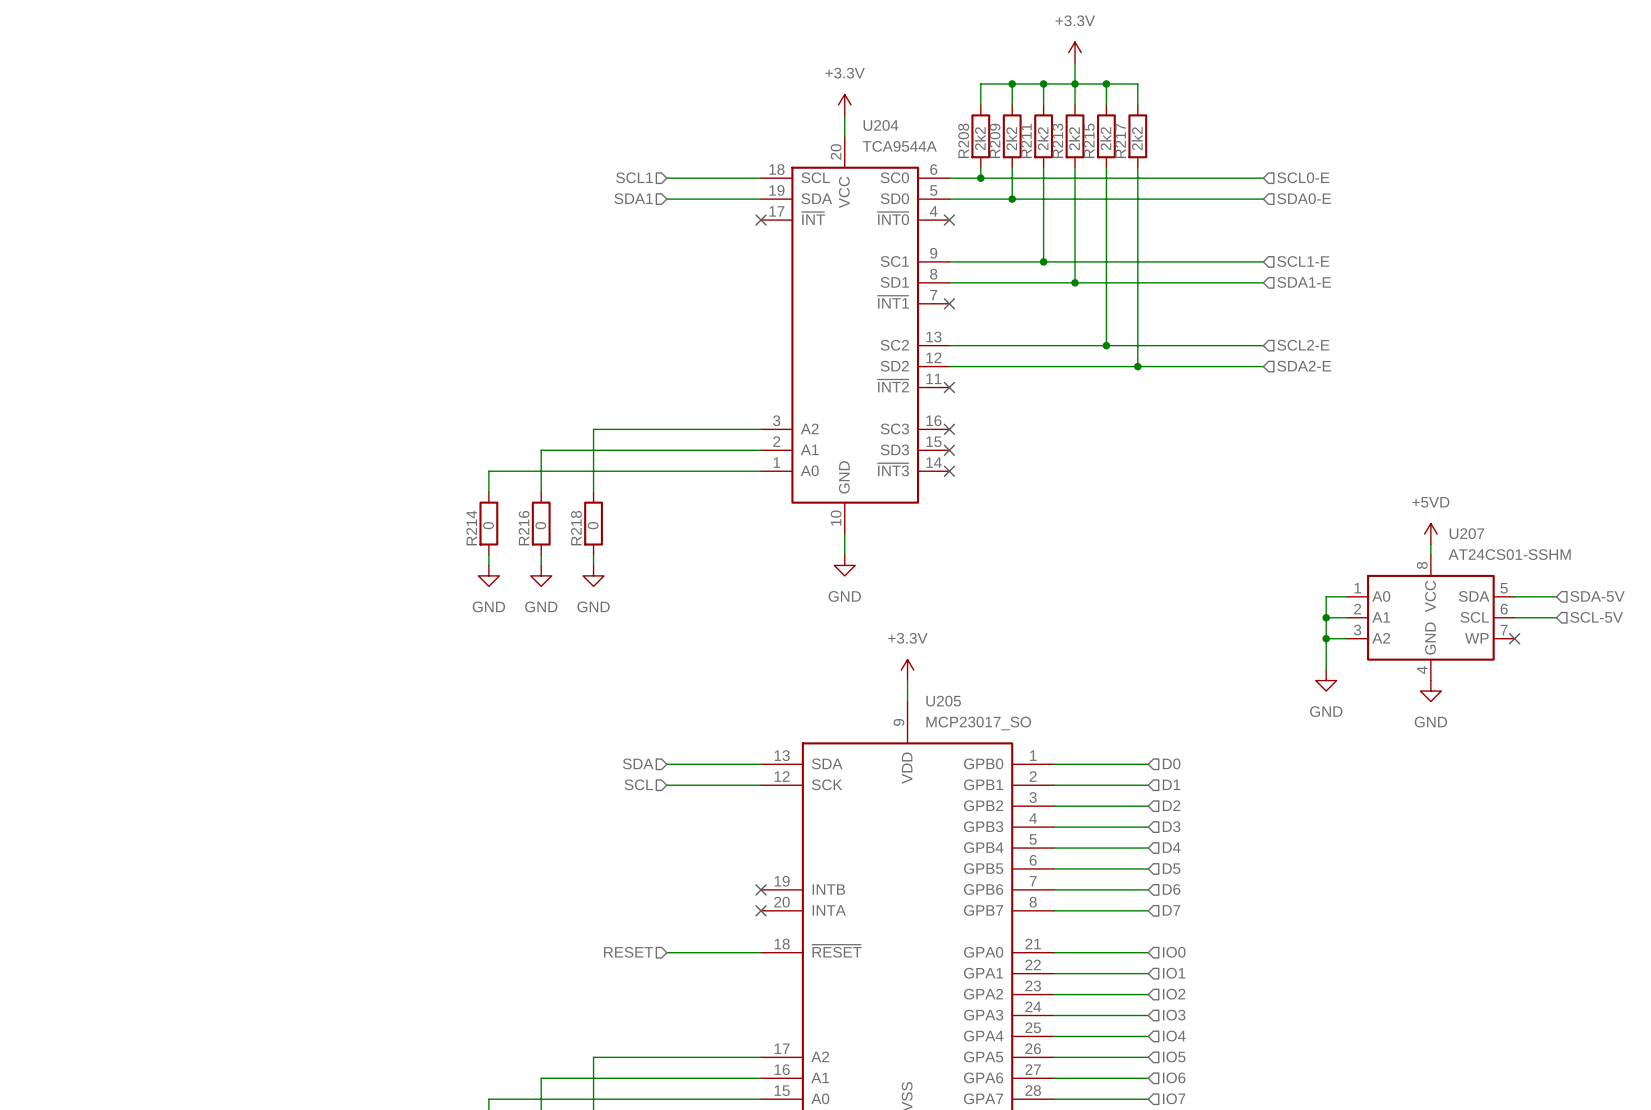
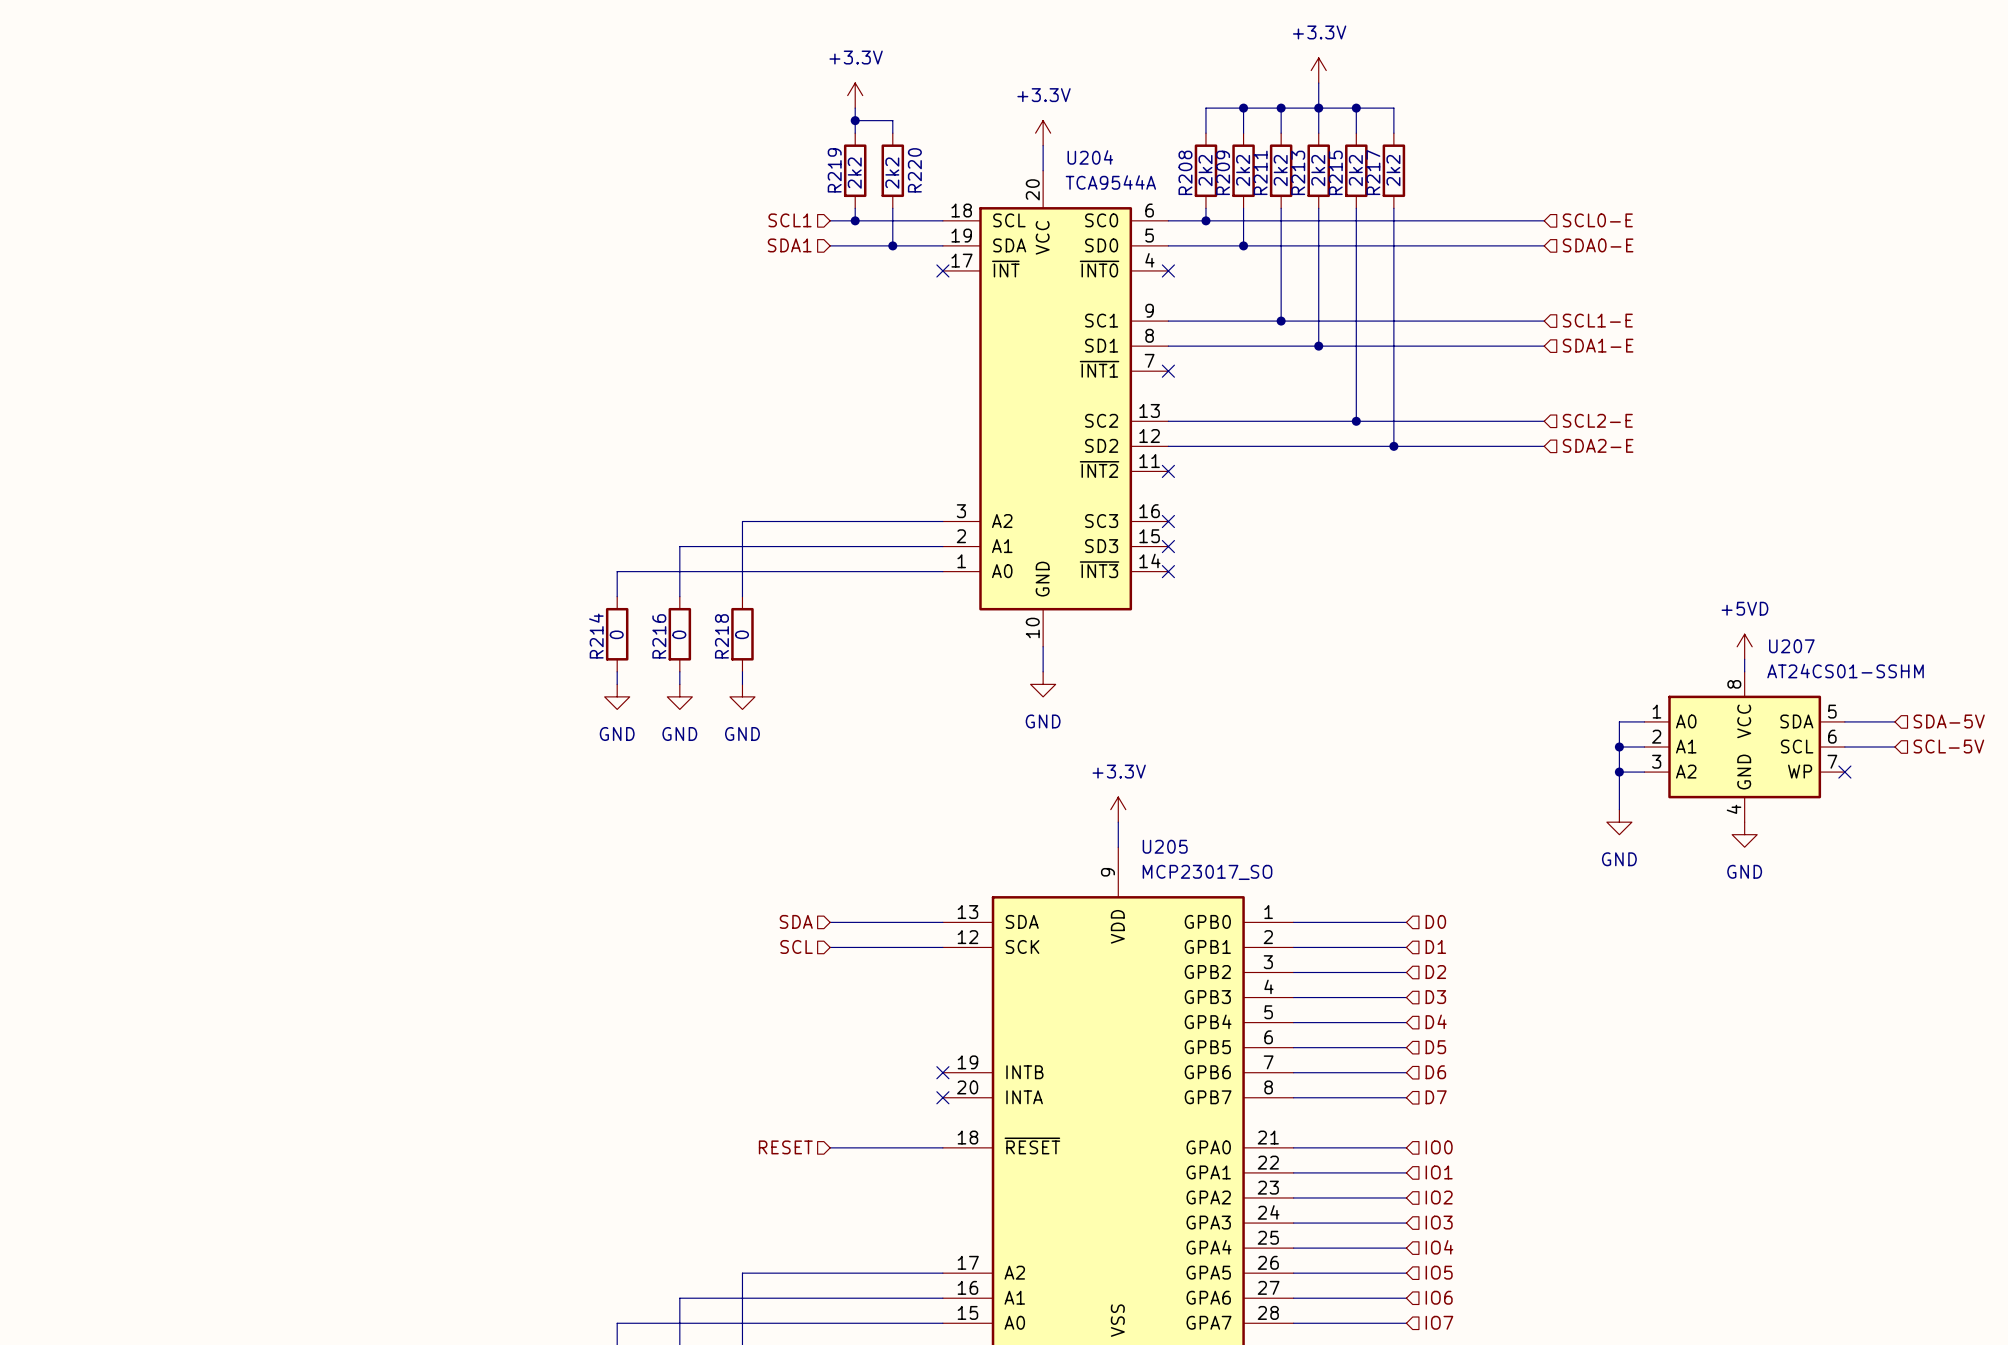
power symbol: none -> +3.3V (855, 95)
wire: none -> (855, 108) (855, 133)
wire: none -> (855, 120) (892, 120) (892, 133)
junction: none -> (855, 120)
R219: none -> 2k2 (855, 170)
R220: none -> 2k2 (892, 170)
wire: none -> (855, 208) (855, 220)
wire: none -> (892, 208) (892, 245)
junction: none -> (855, 220)
junction: none -> (892, 245)

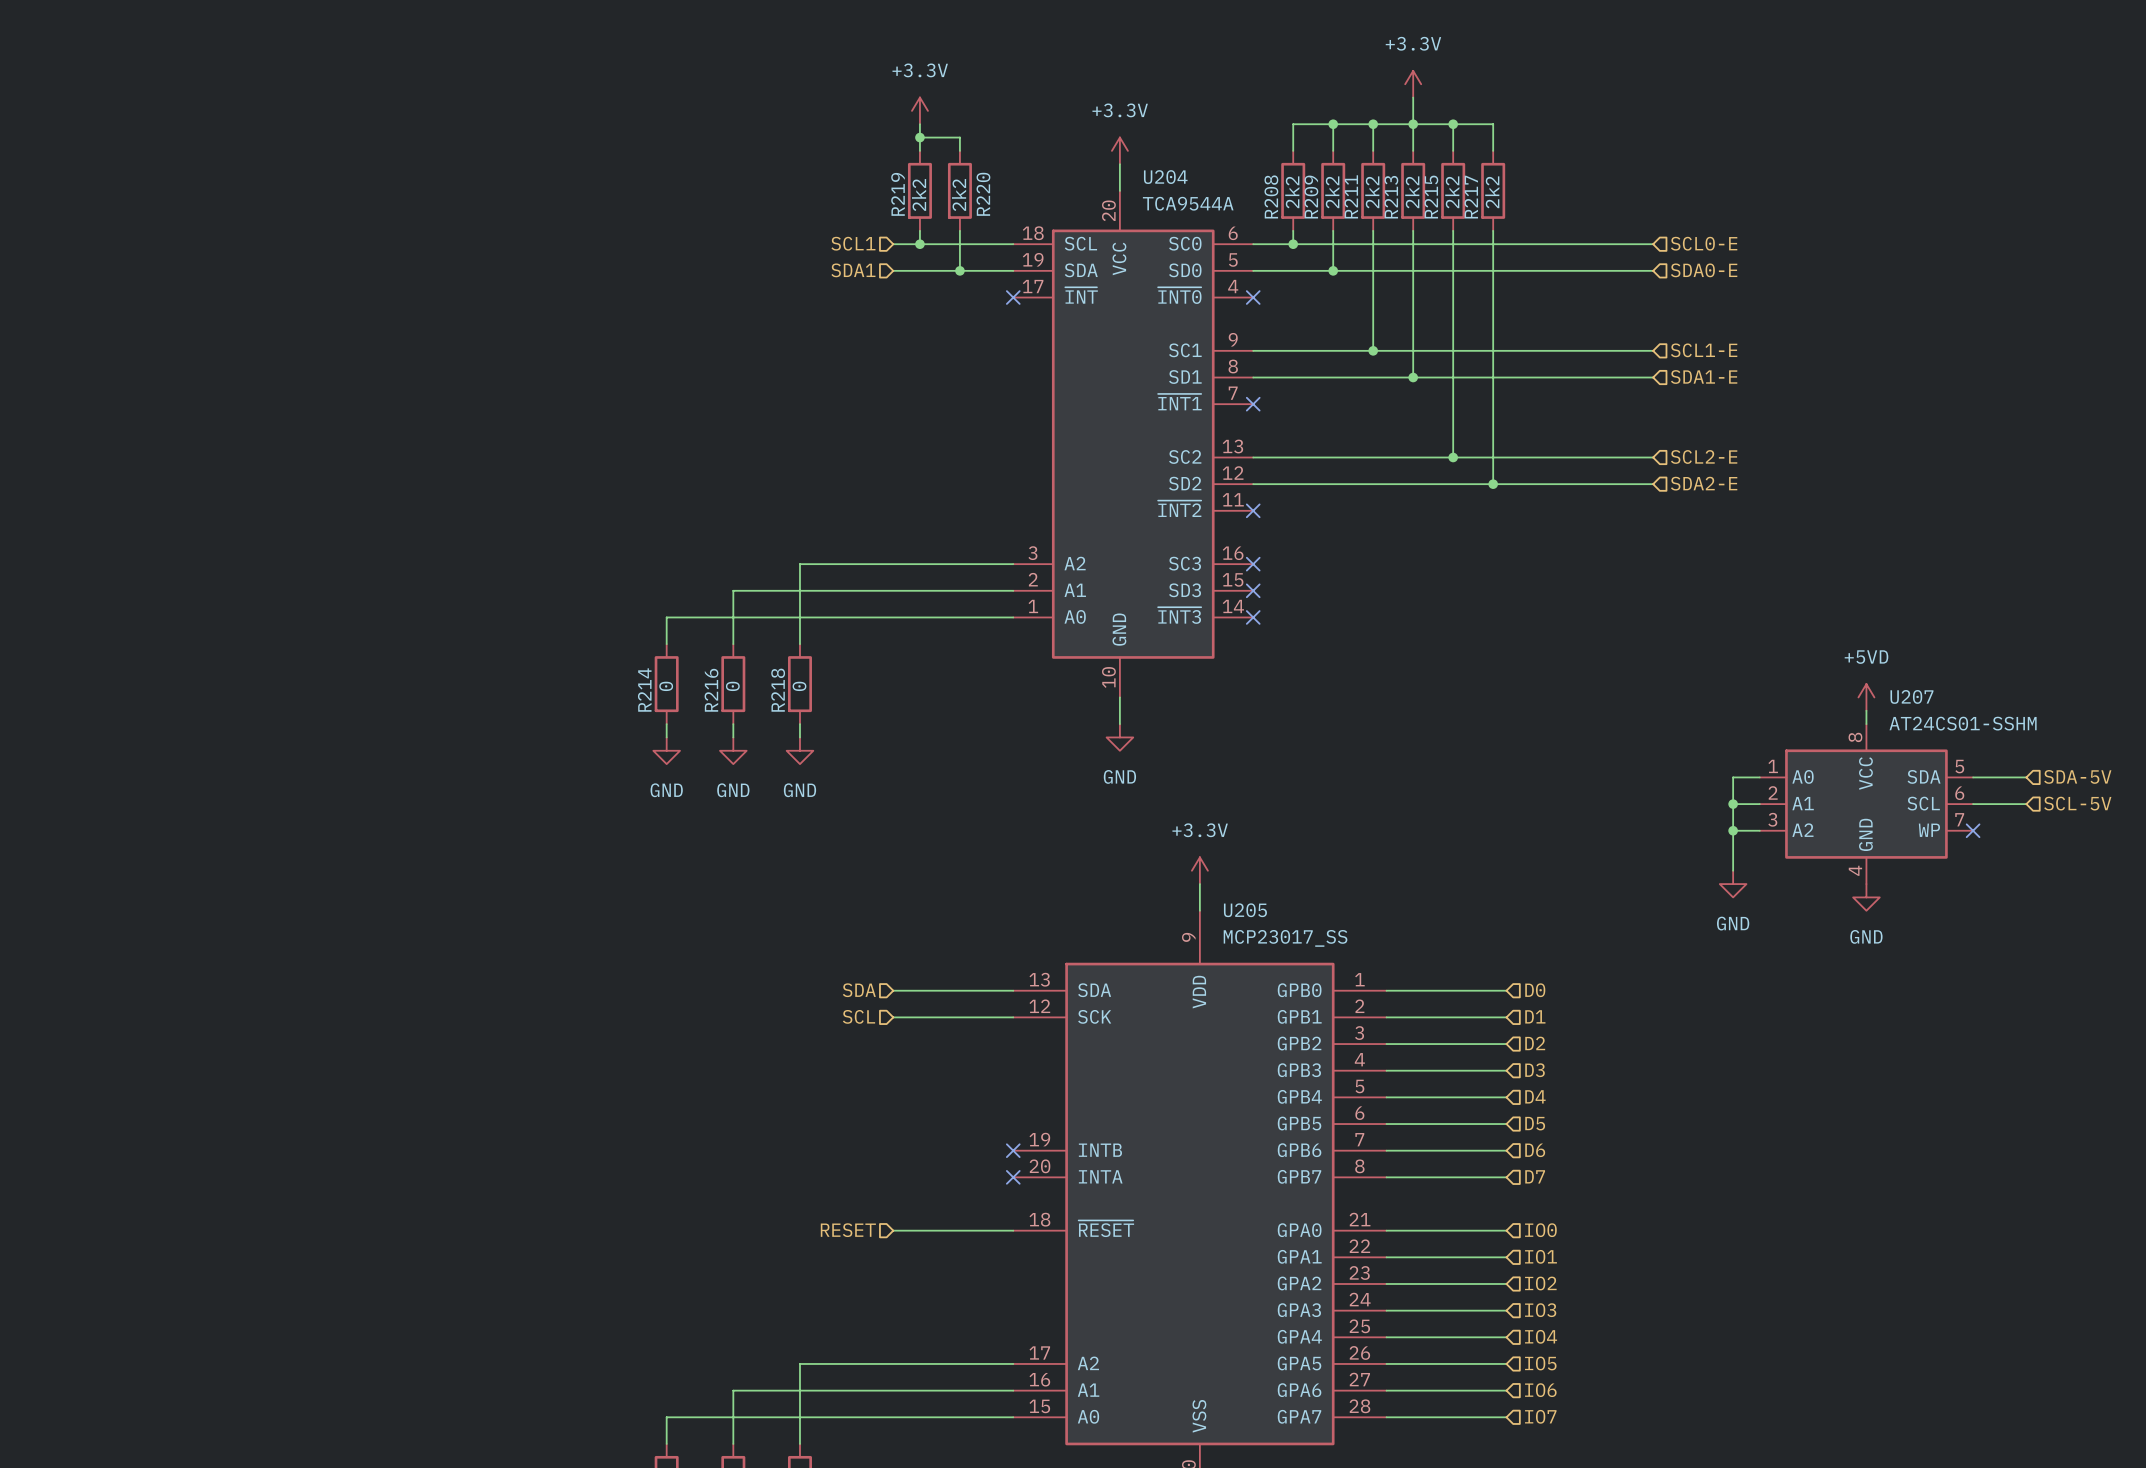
U205 value: MCP23017_SO (1207, 872) -> MCP23017_SS (1285, 938)

